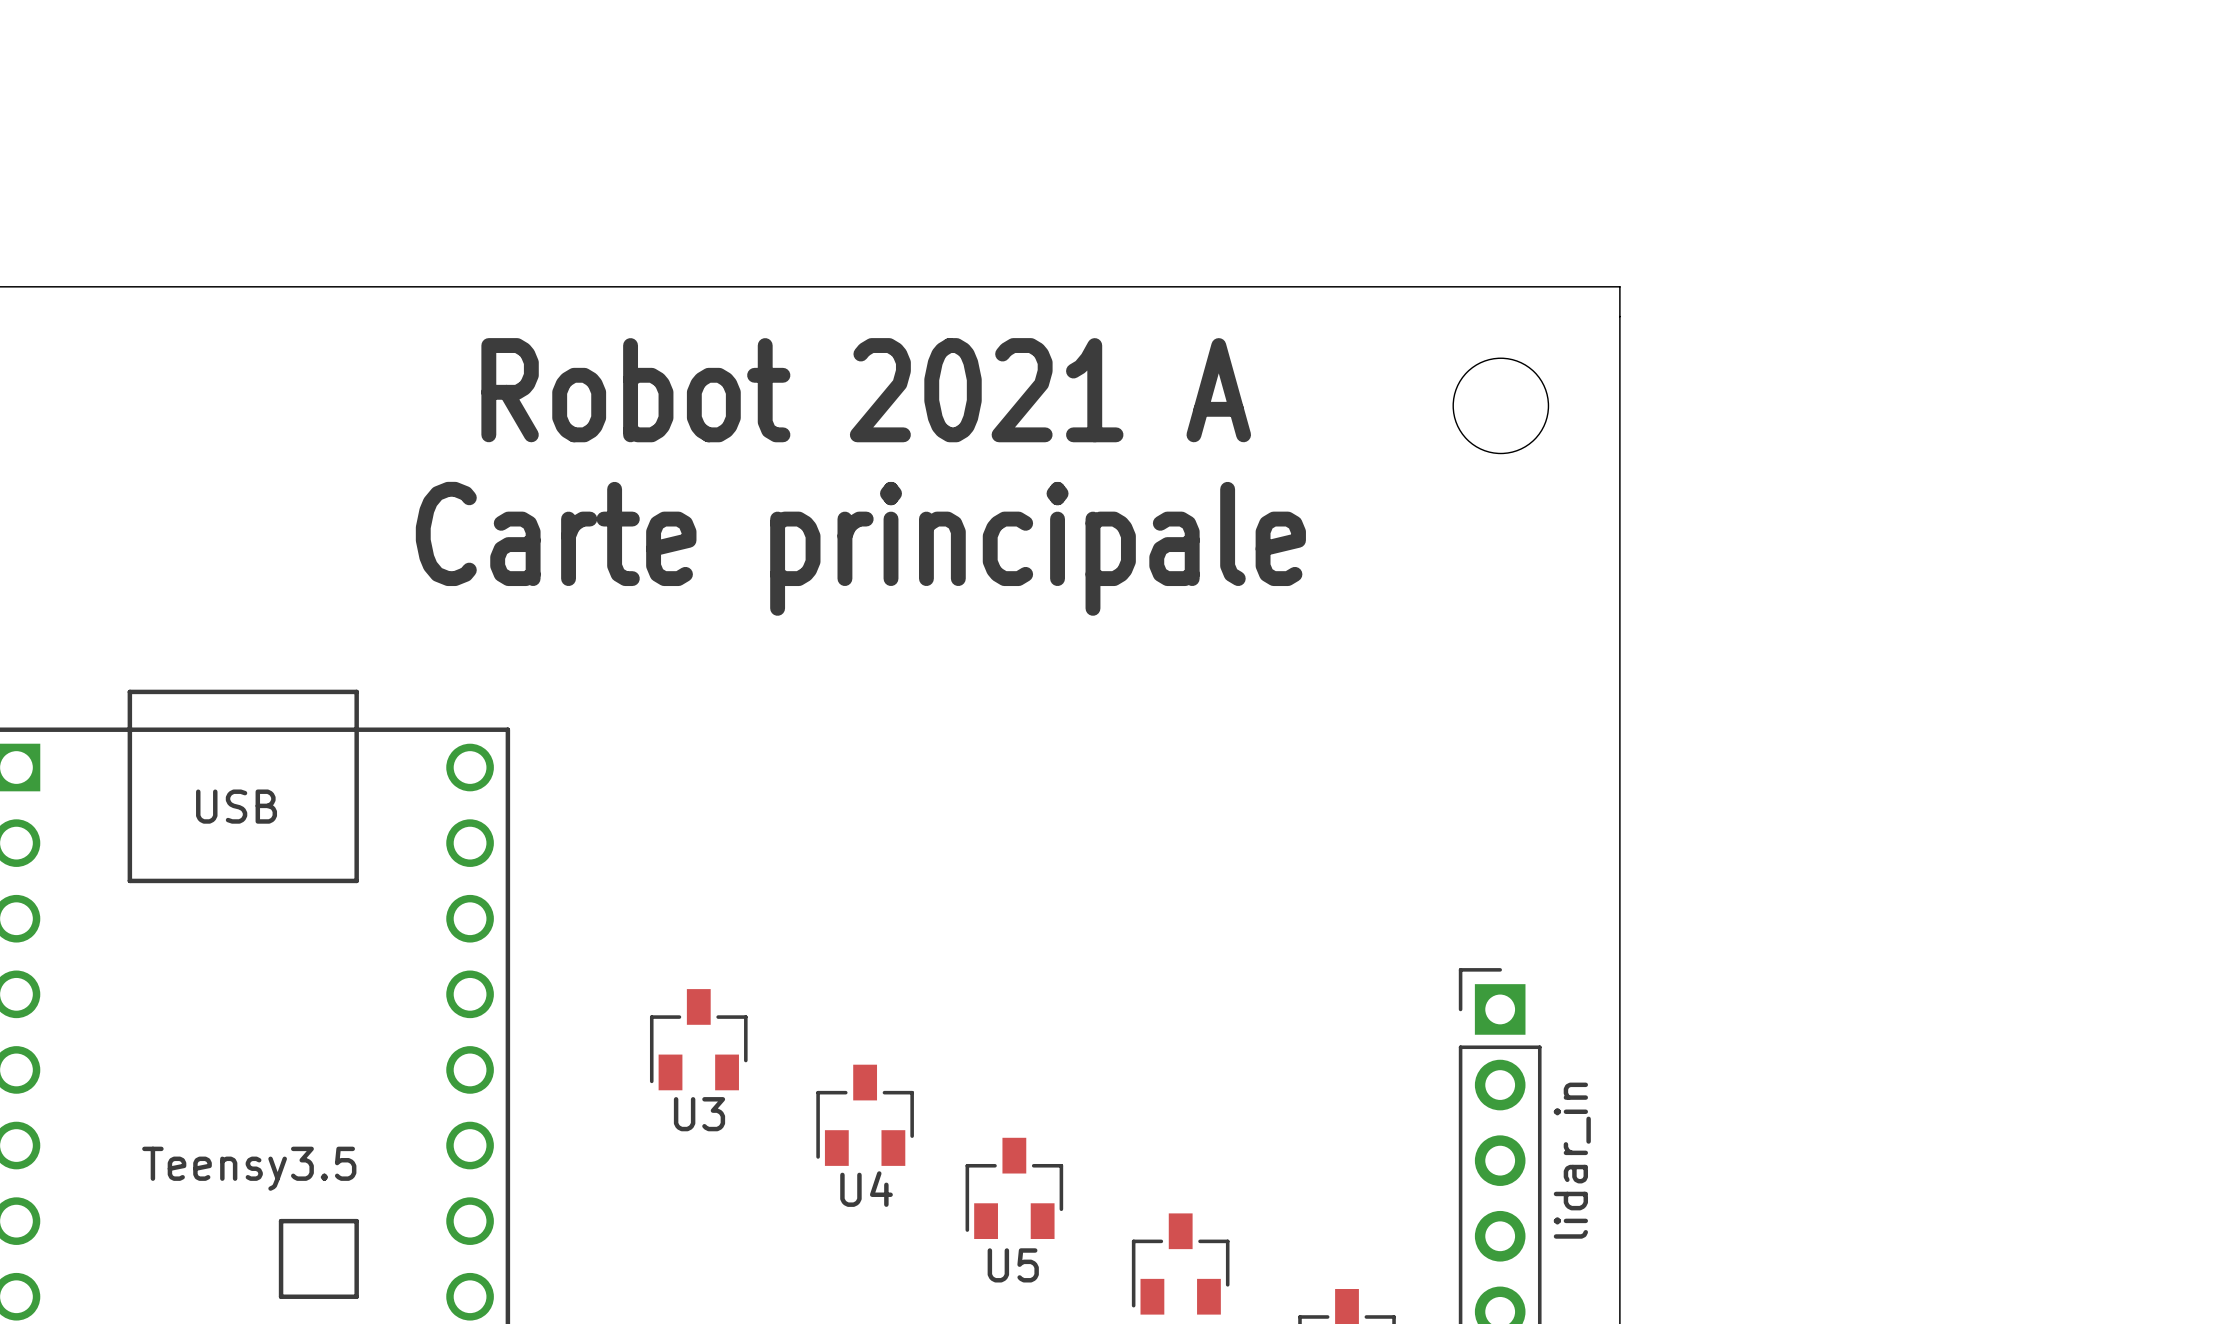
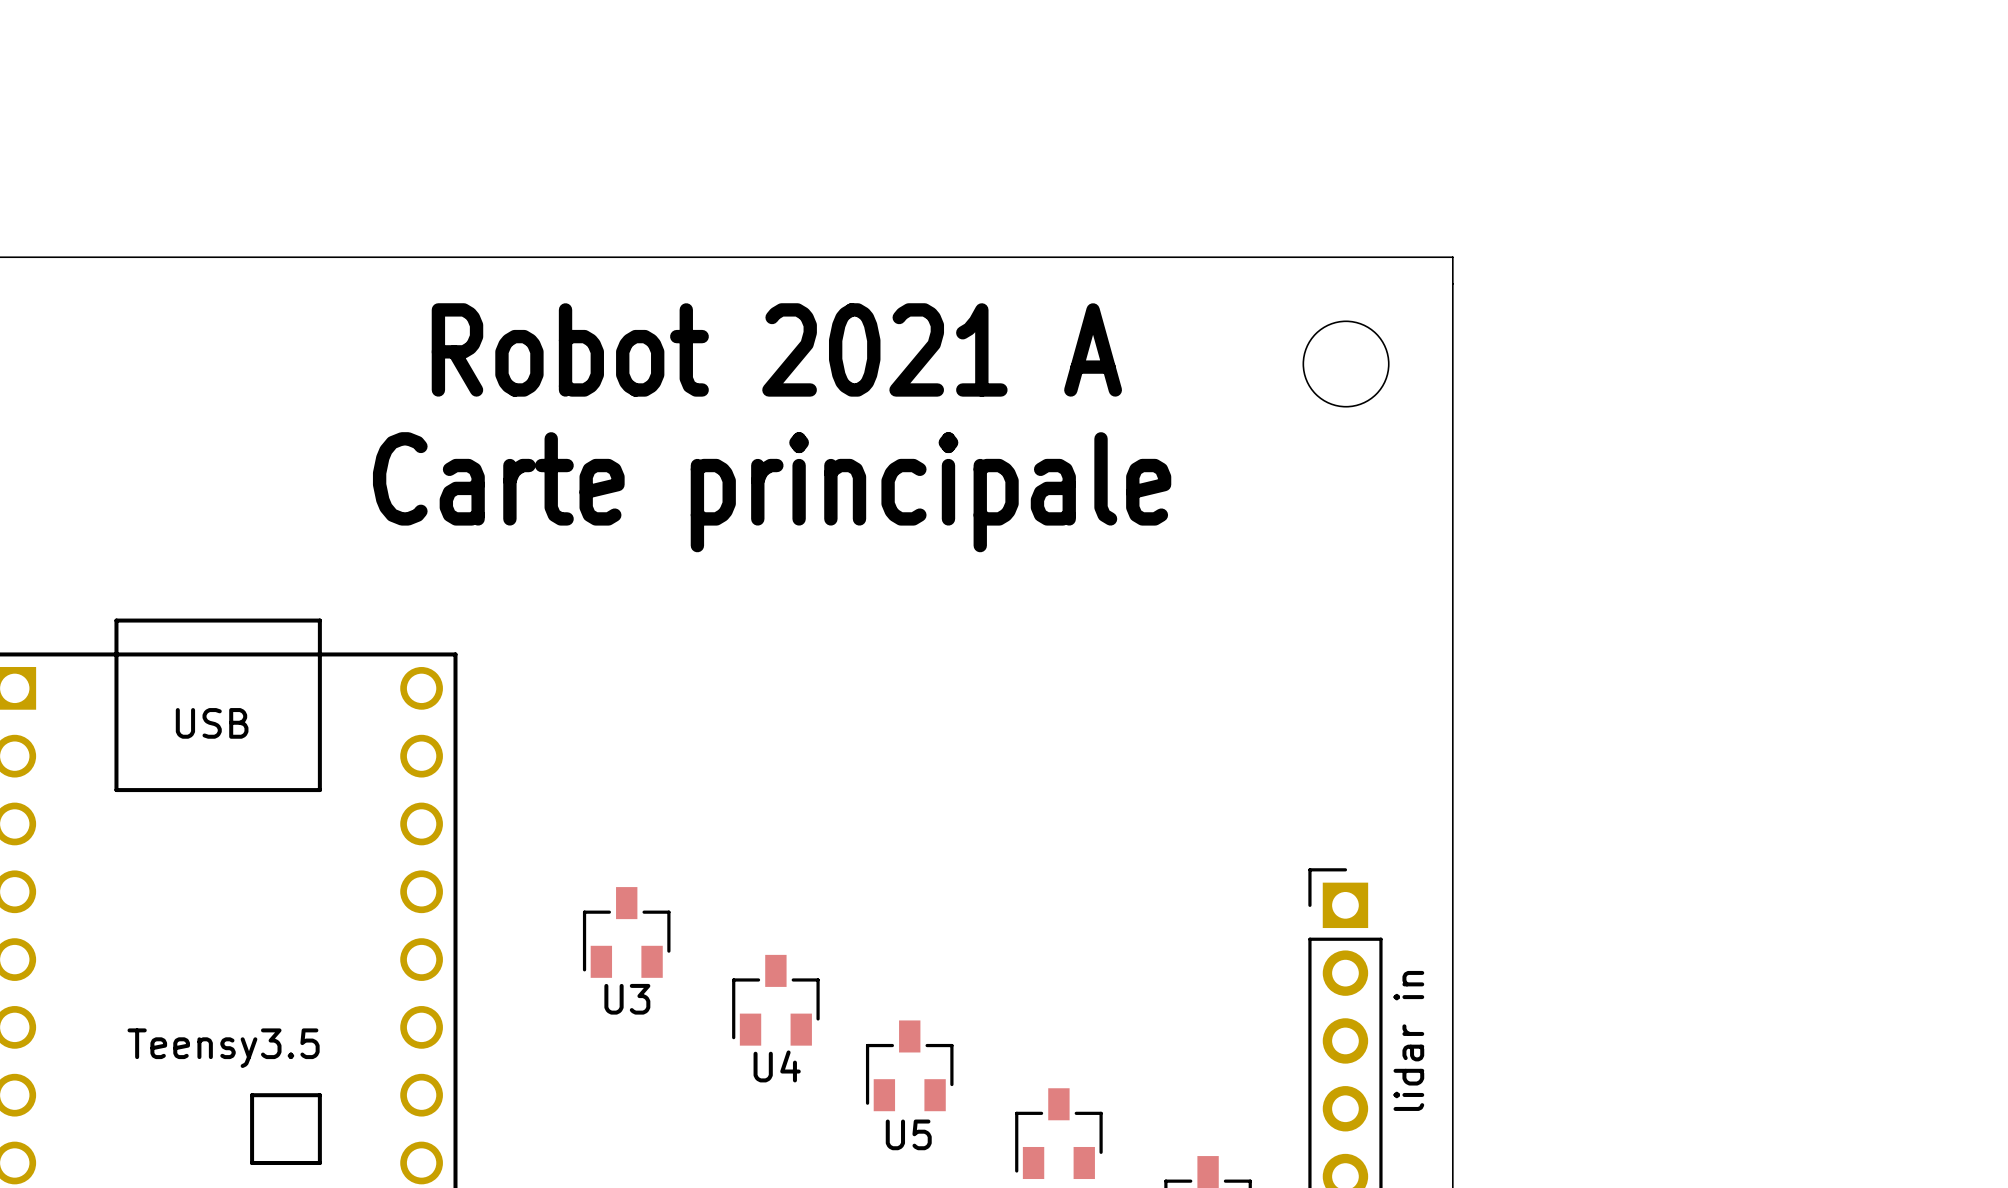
part value: lidar_in (1572, 1160) -> lidar in (1408, 1040)

